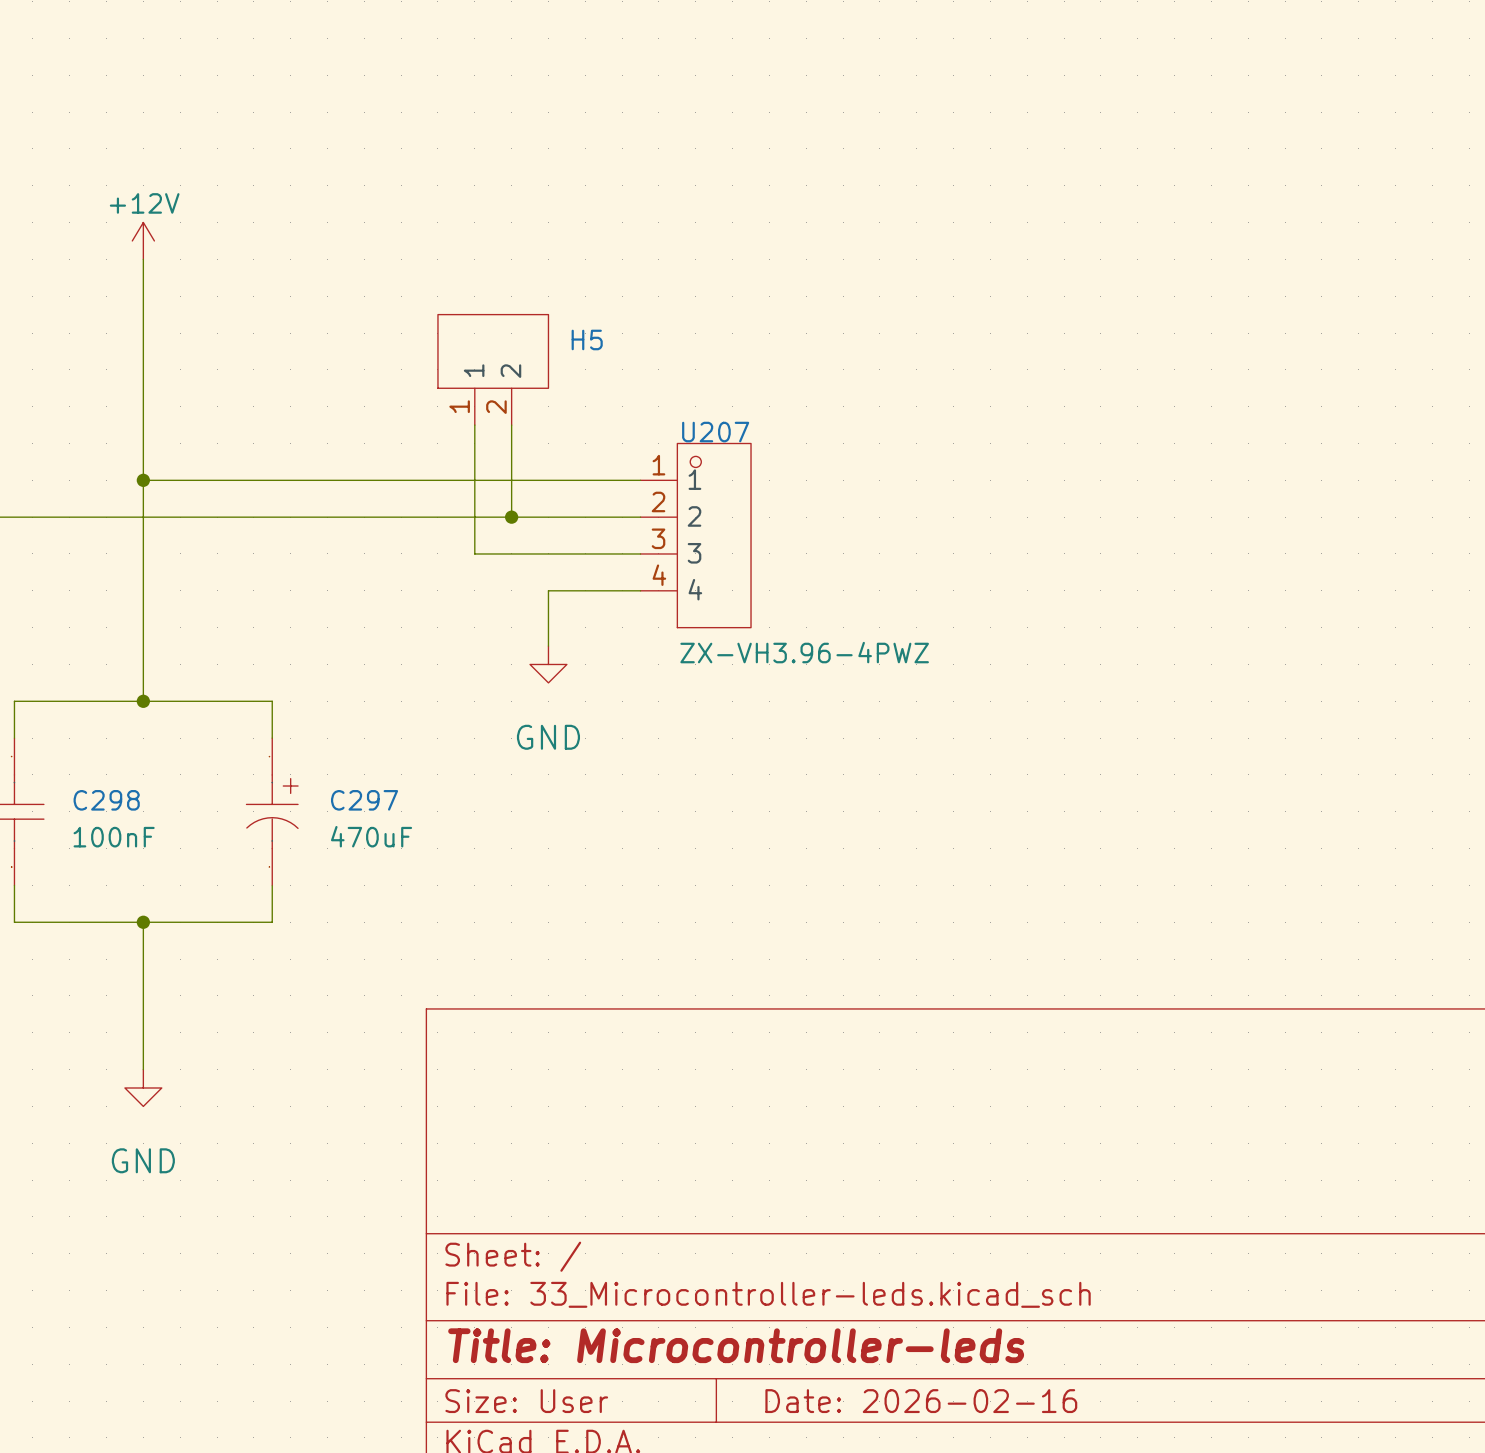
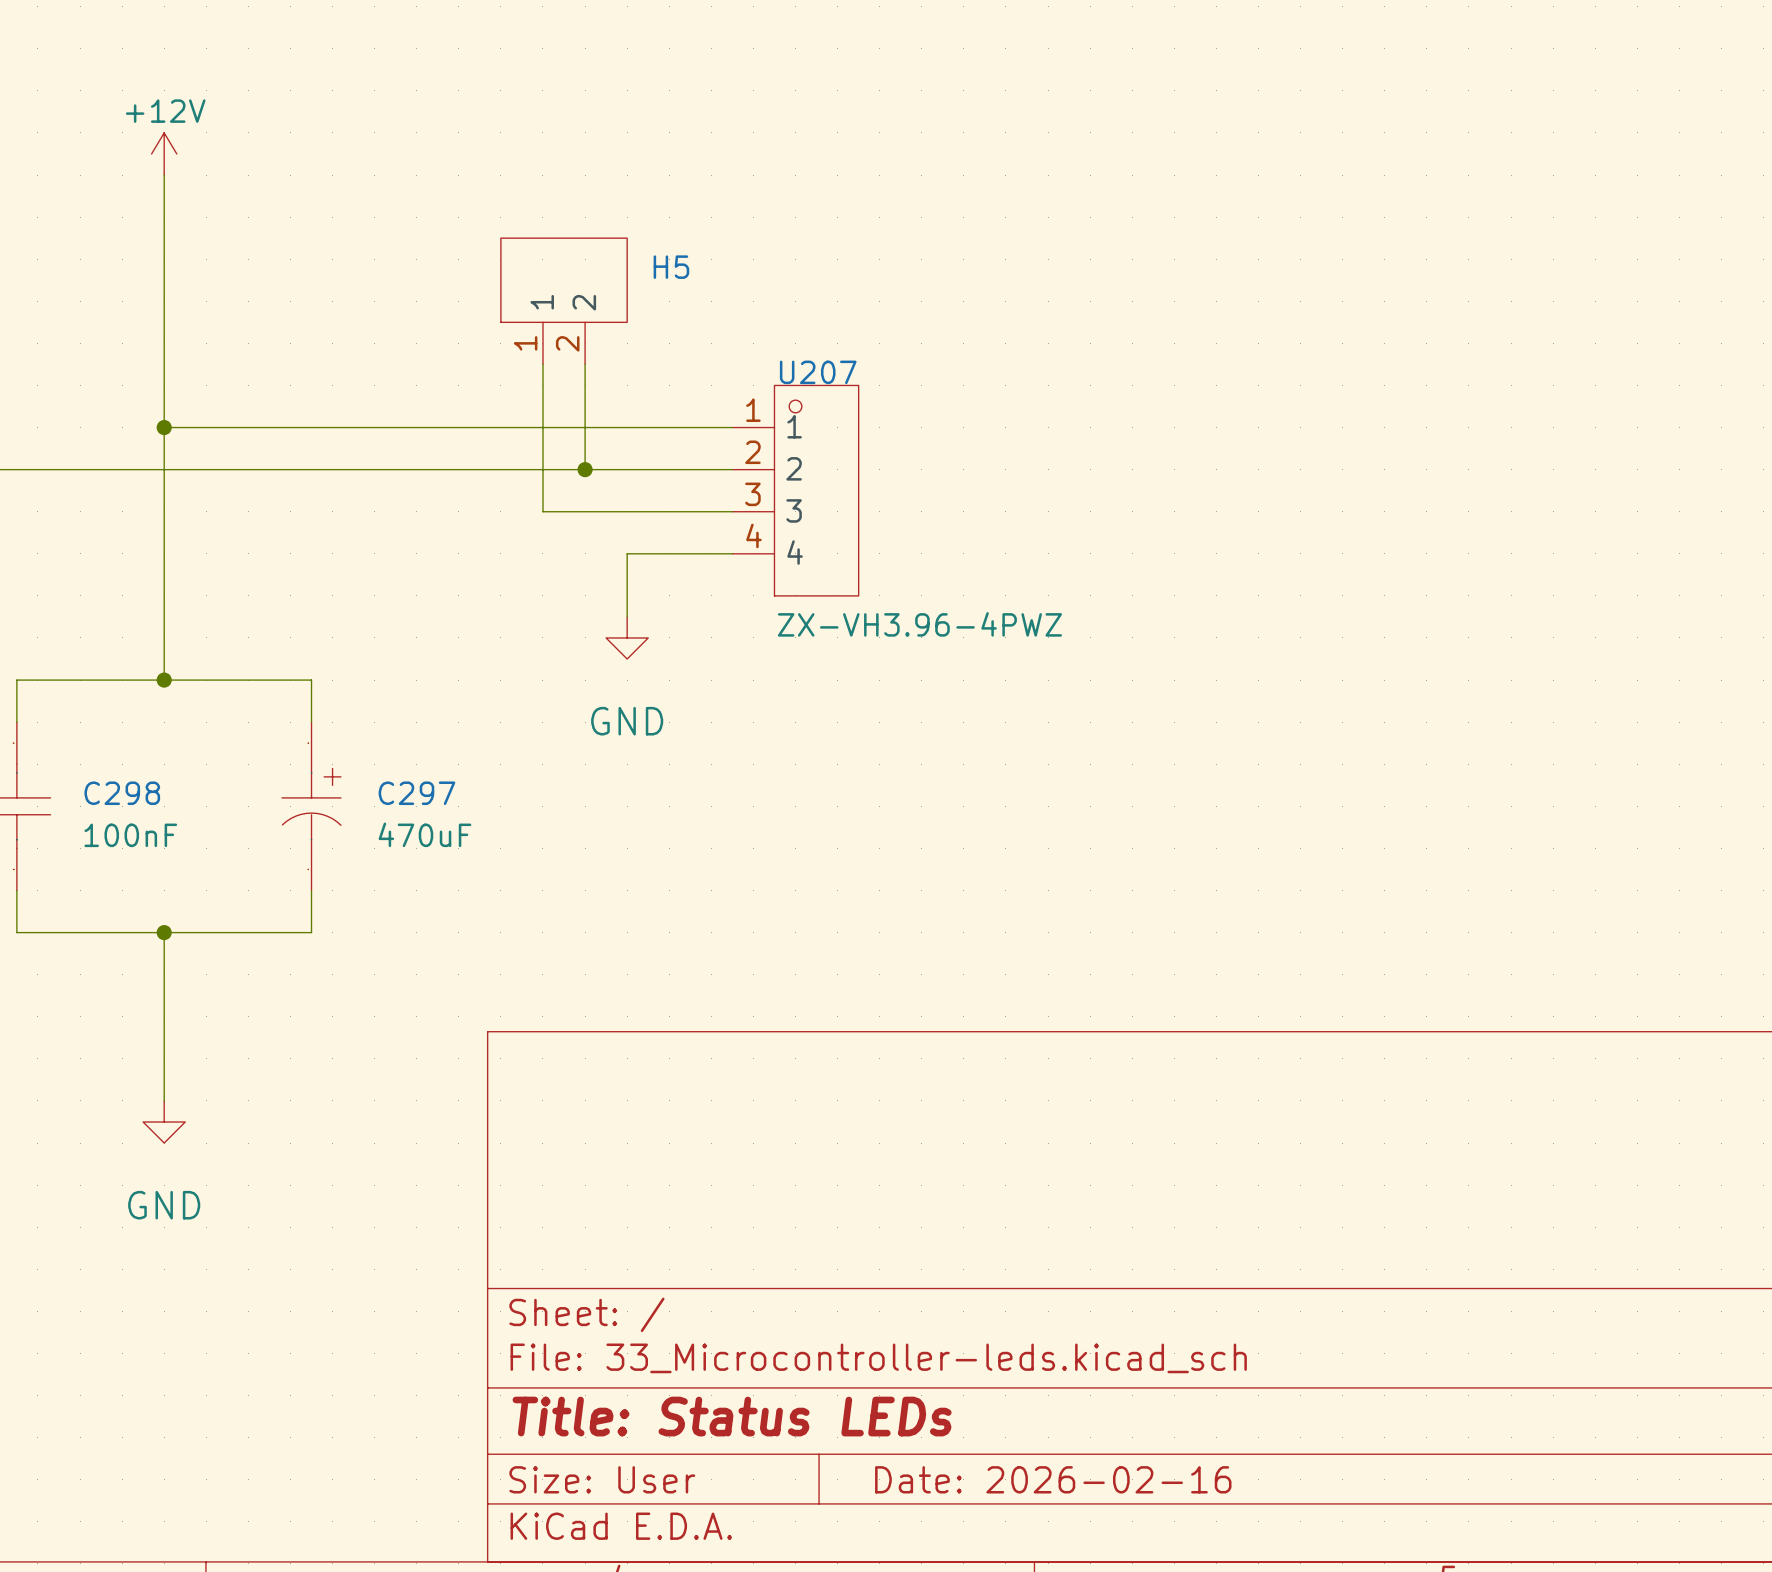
title block: Title: Microcontroller-leds (736, 1345) -> Title: Status LEDs (732, 1416)

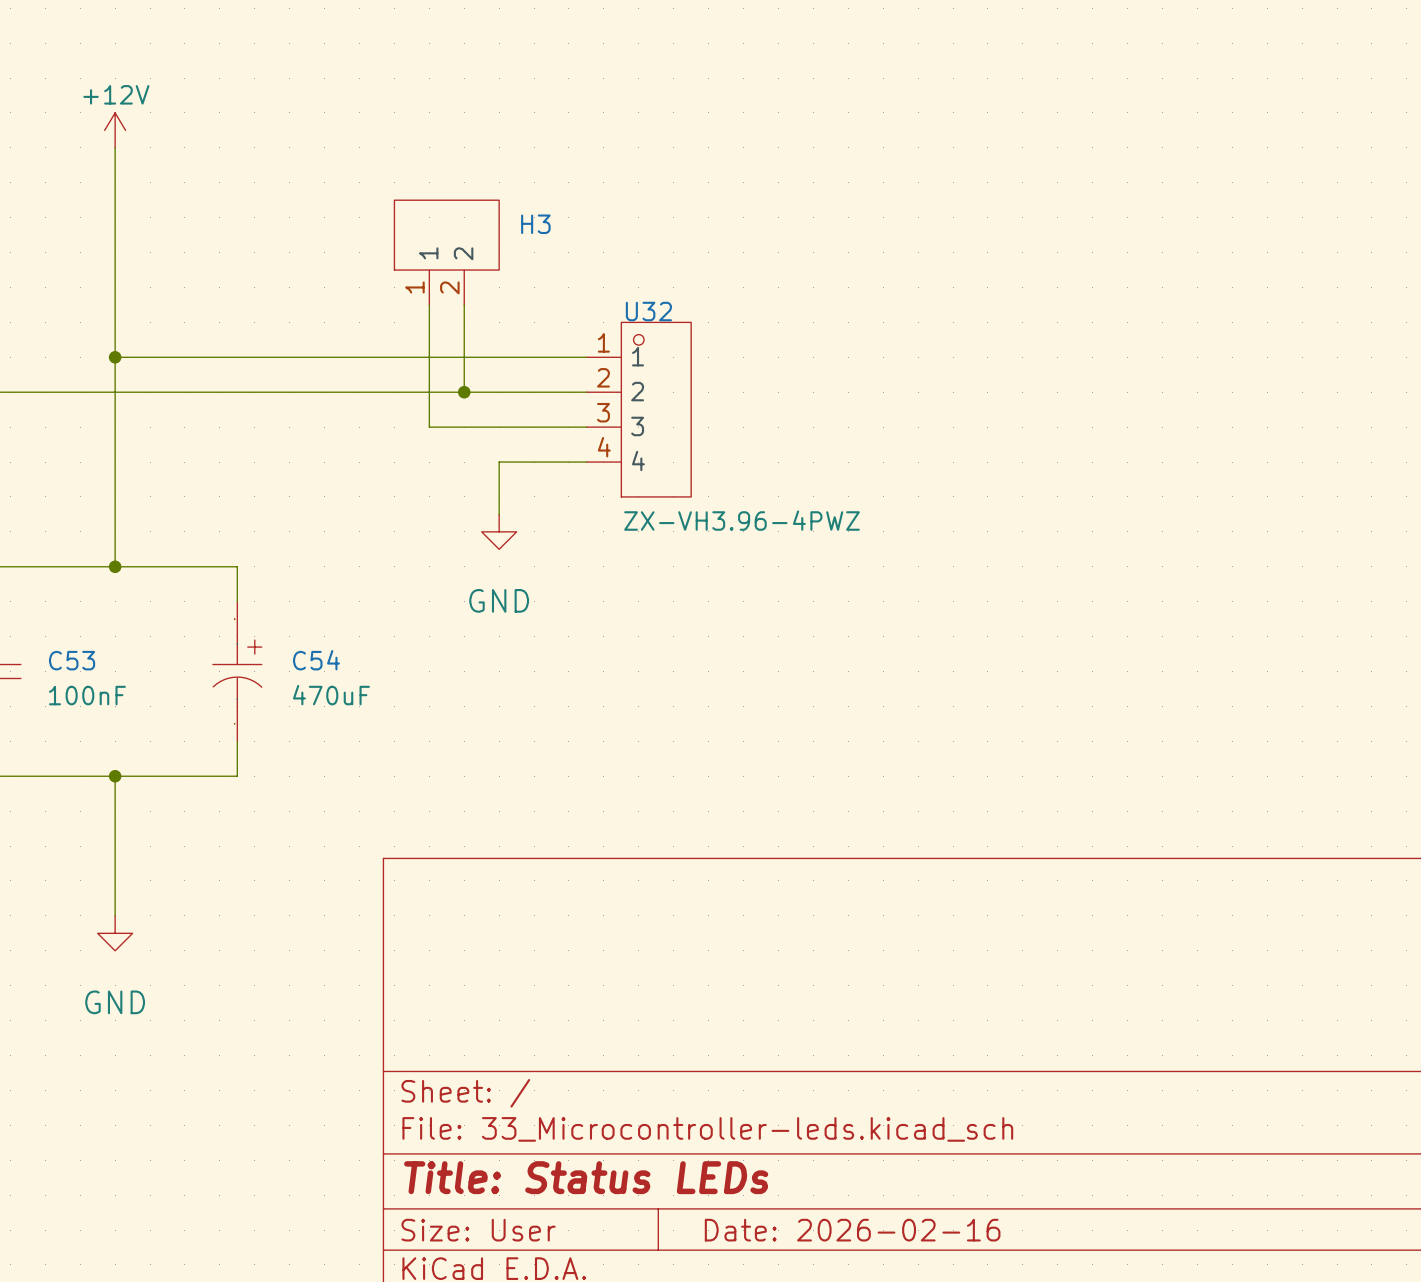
H5 name: H5 (671, 267) -> H3 (535, 224)
U207 name: U207 (818, 372) -> U32 (648, 311)
C298 name: C298 (122, 793) -> C53 (72, 660)
C297 name: C297 (416, 793) -> C54 (316, 660)

